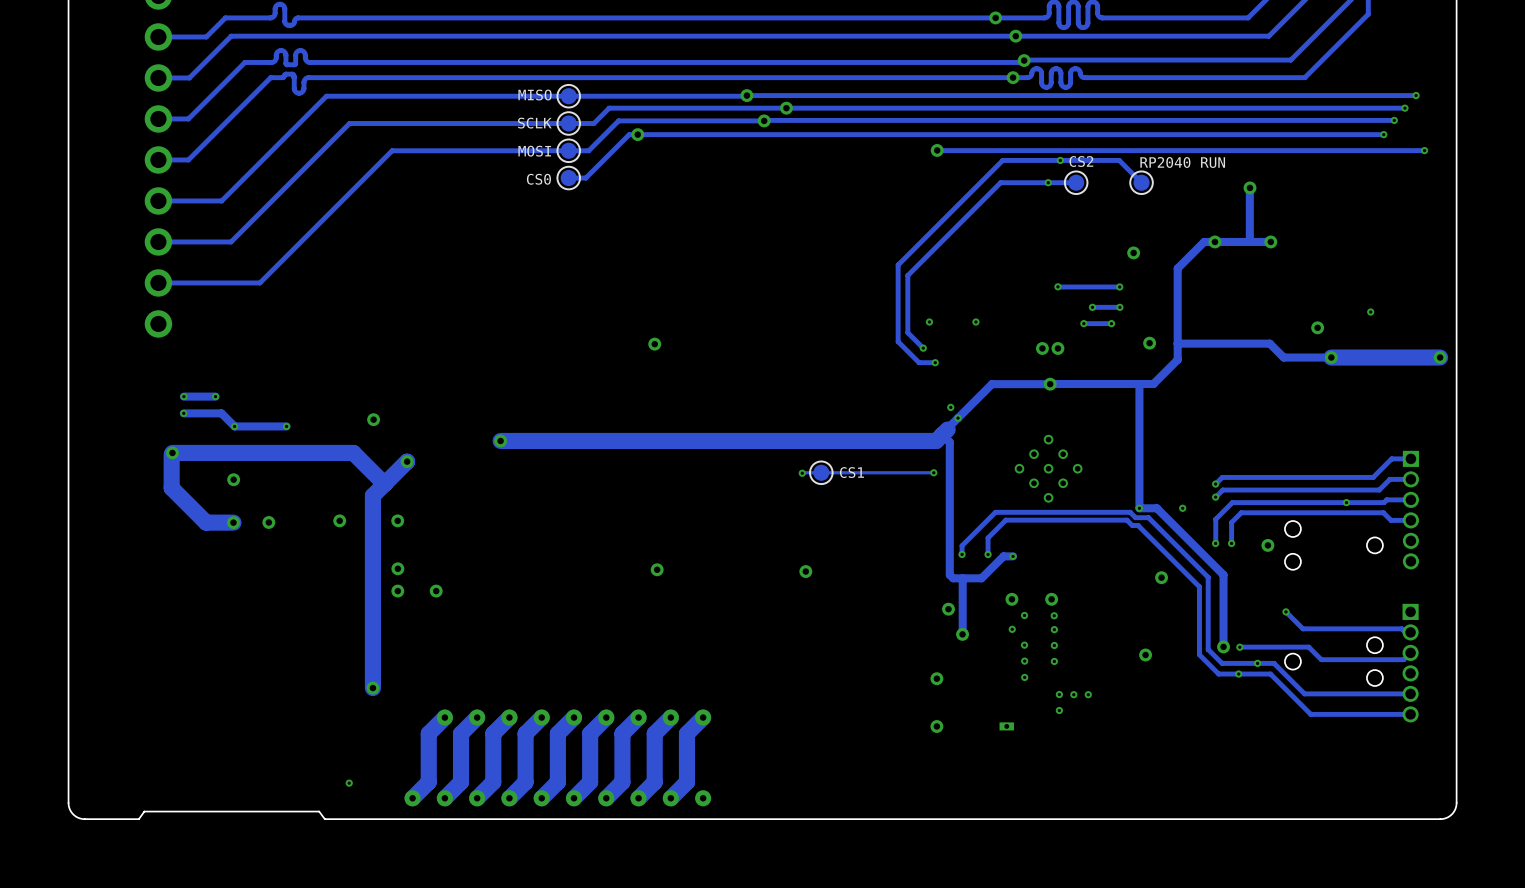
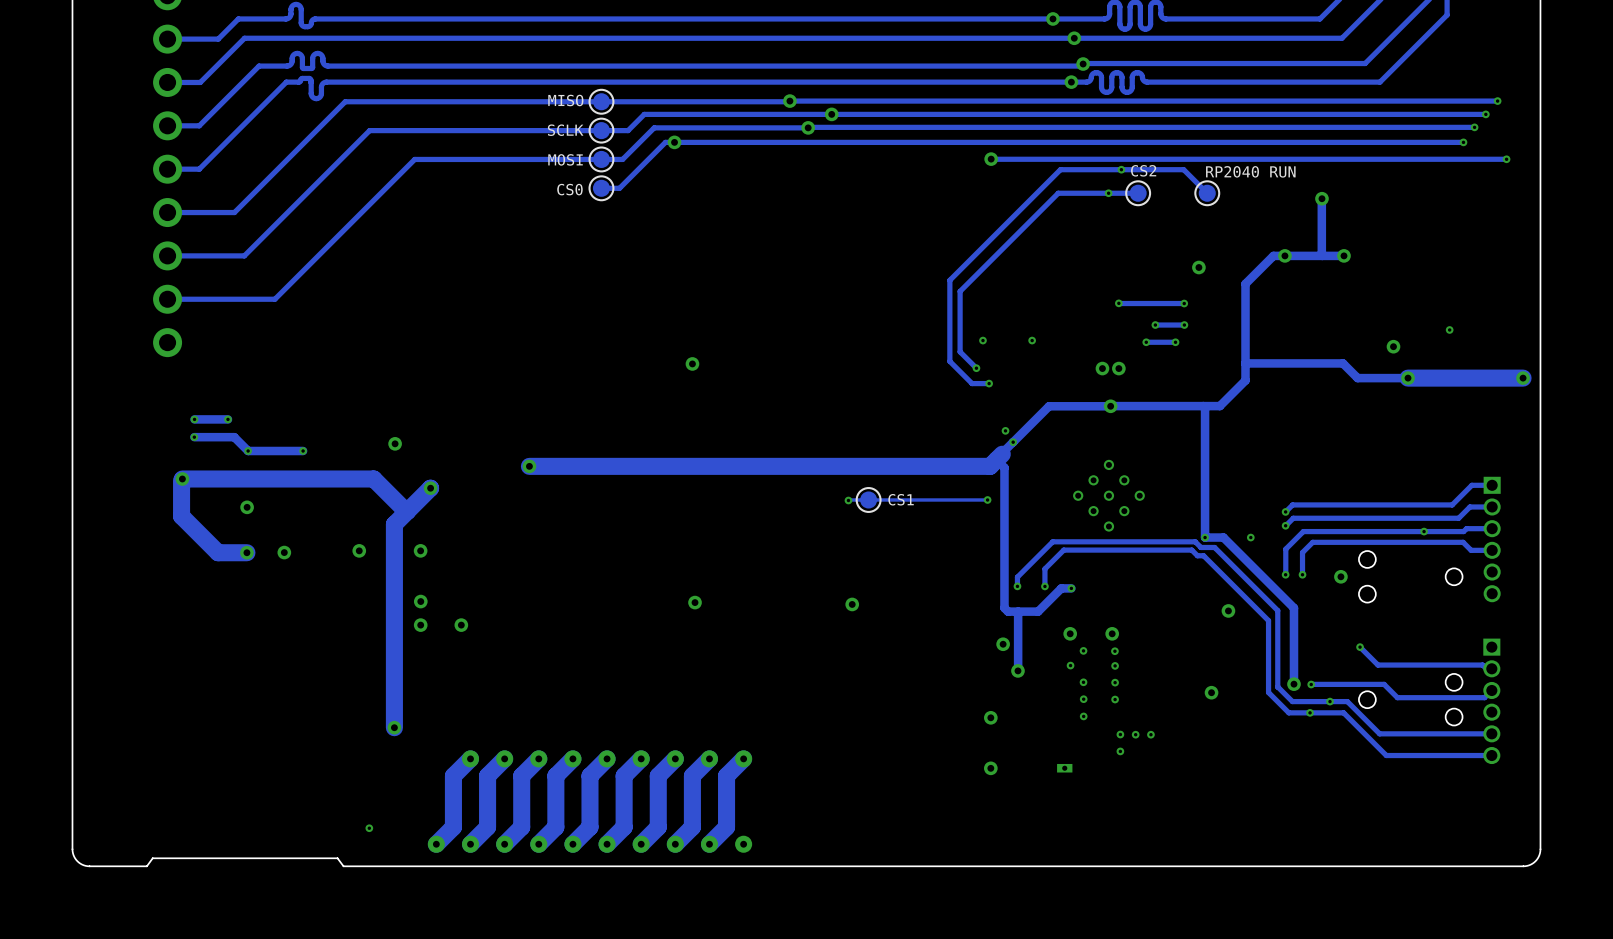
via: (1149, 343) -> none

